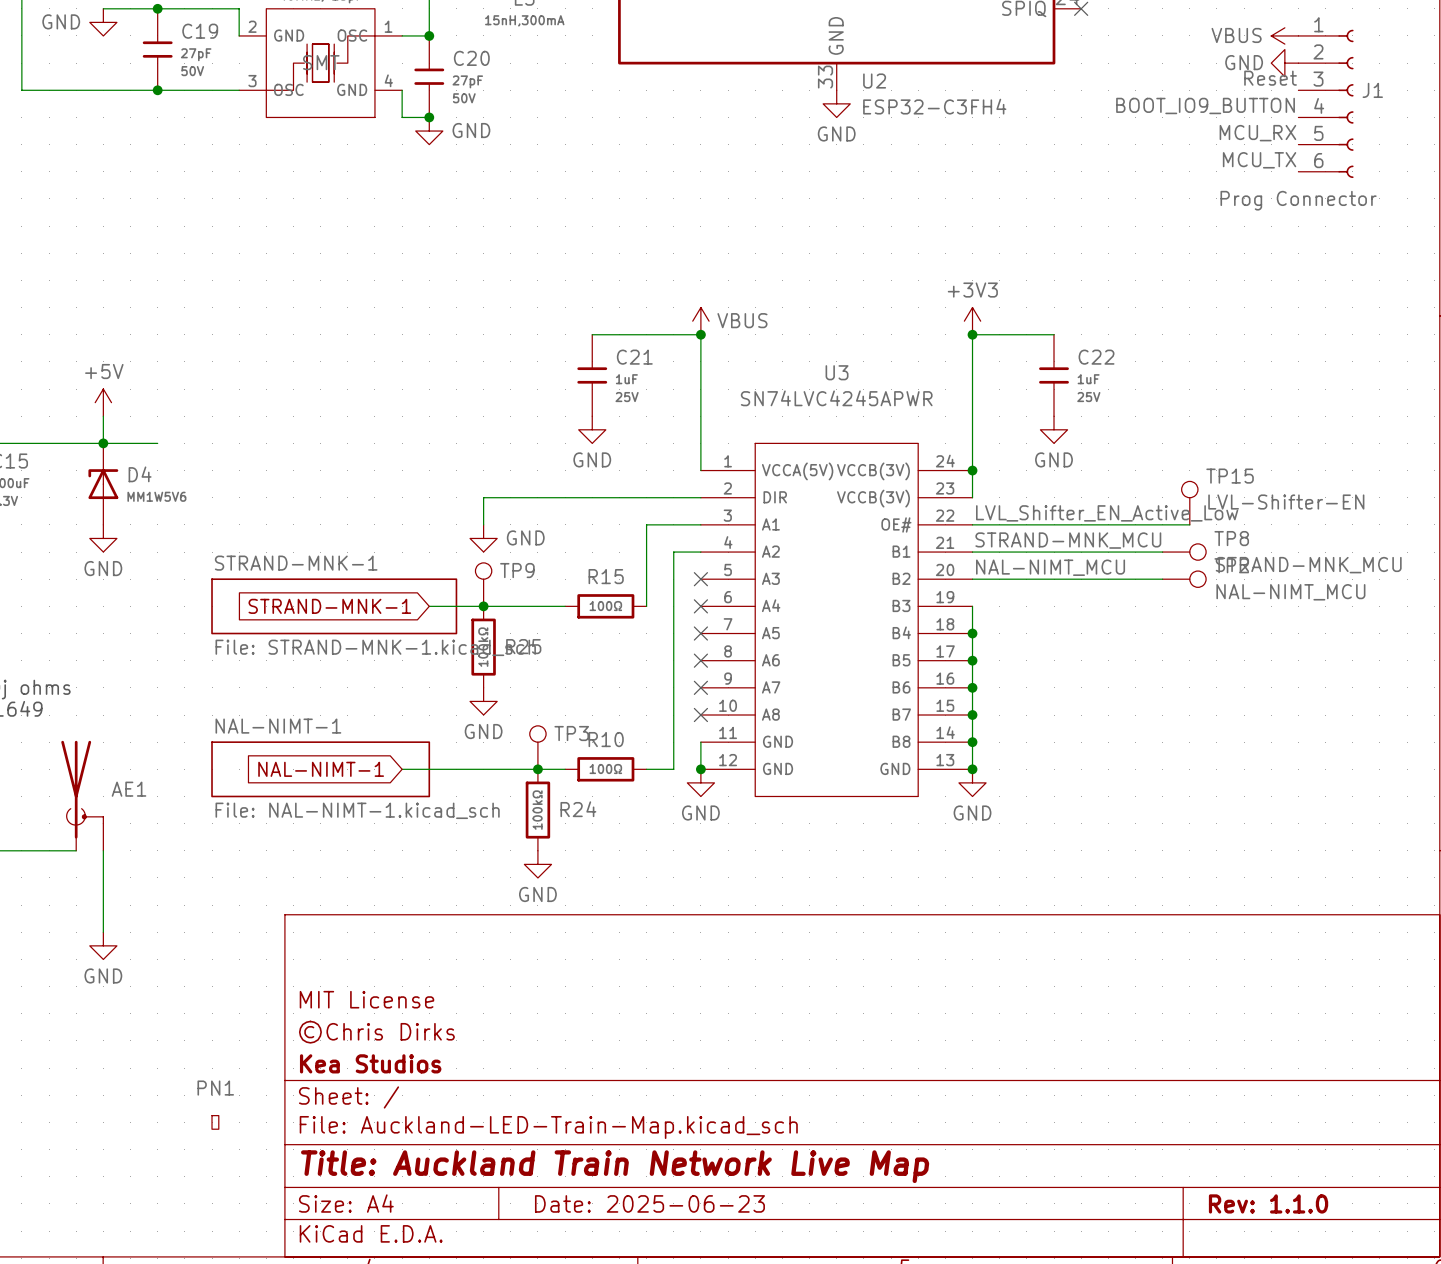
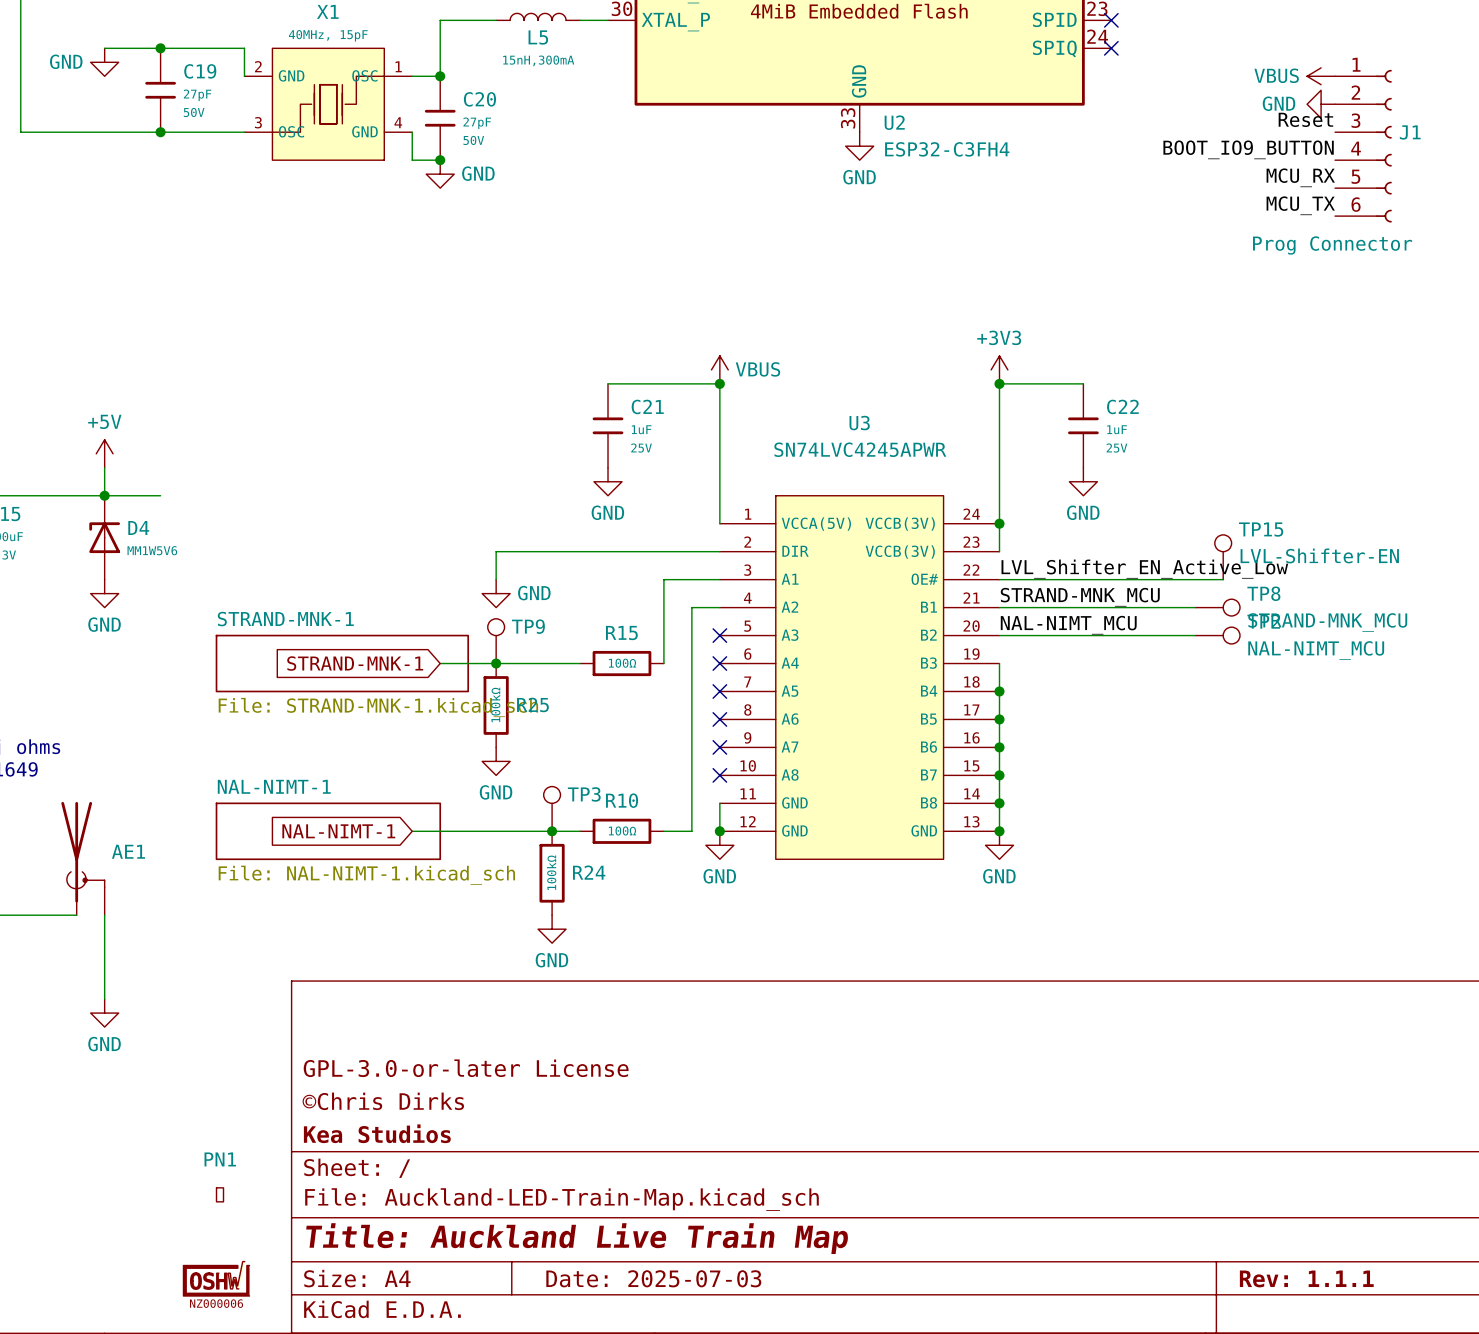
X1 text: SMT (321, 62) -> none
title block: MIT License (366, 999) -> GPL-3.0-or-later License (466, 1068)
title block: Title: Auckland Train Network Live Map (615, 1166) -> Title: Auckland Live Train Map (577, 1238)
part: none -> (216, 1278)
title block: Date: 2025-06-23 (649, 1203) -> Date: 2025-07-03 (653, 1278)
title block: Rev: 1.1.0 (1268, 1203) -> Rev: 1.1.1 (1306, 1278)

